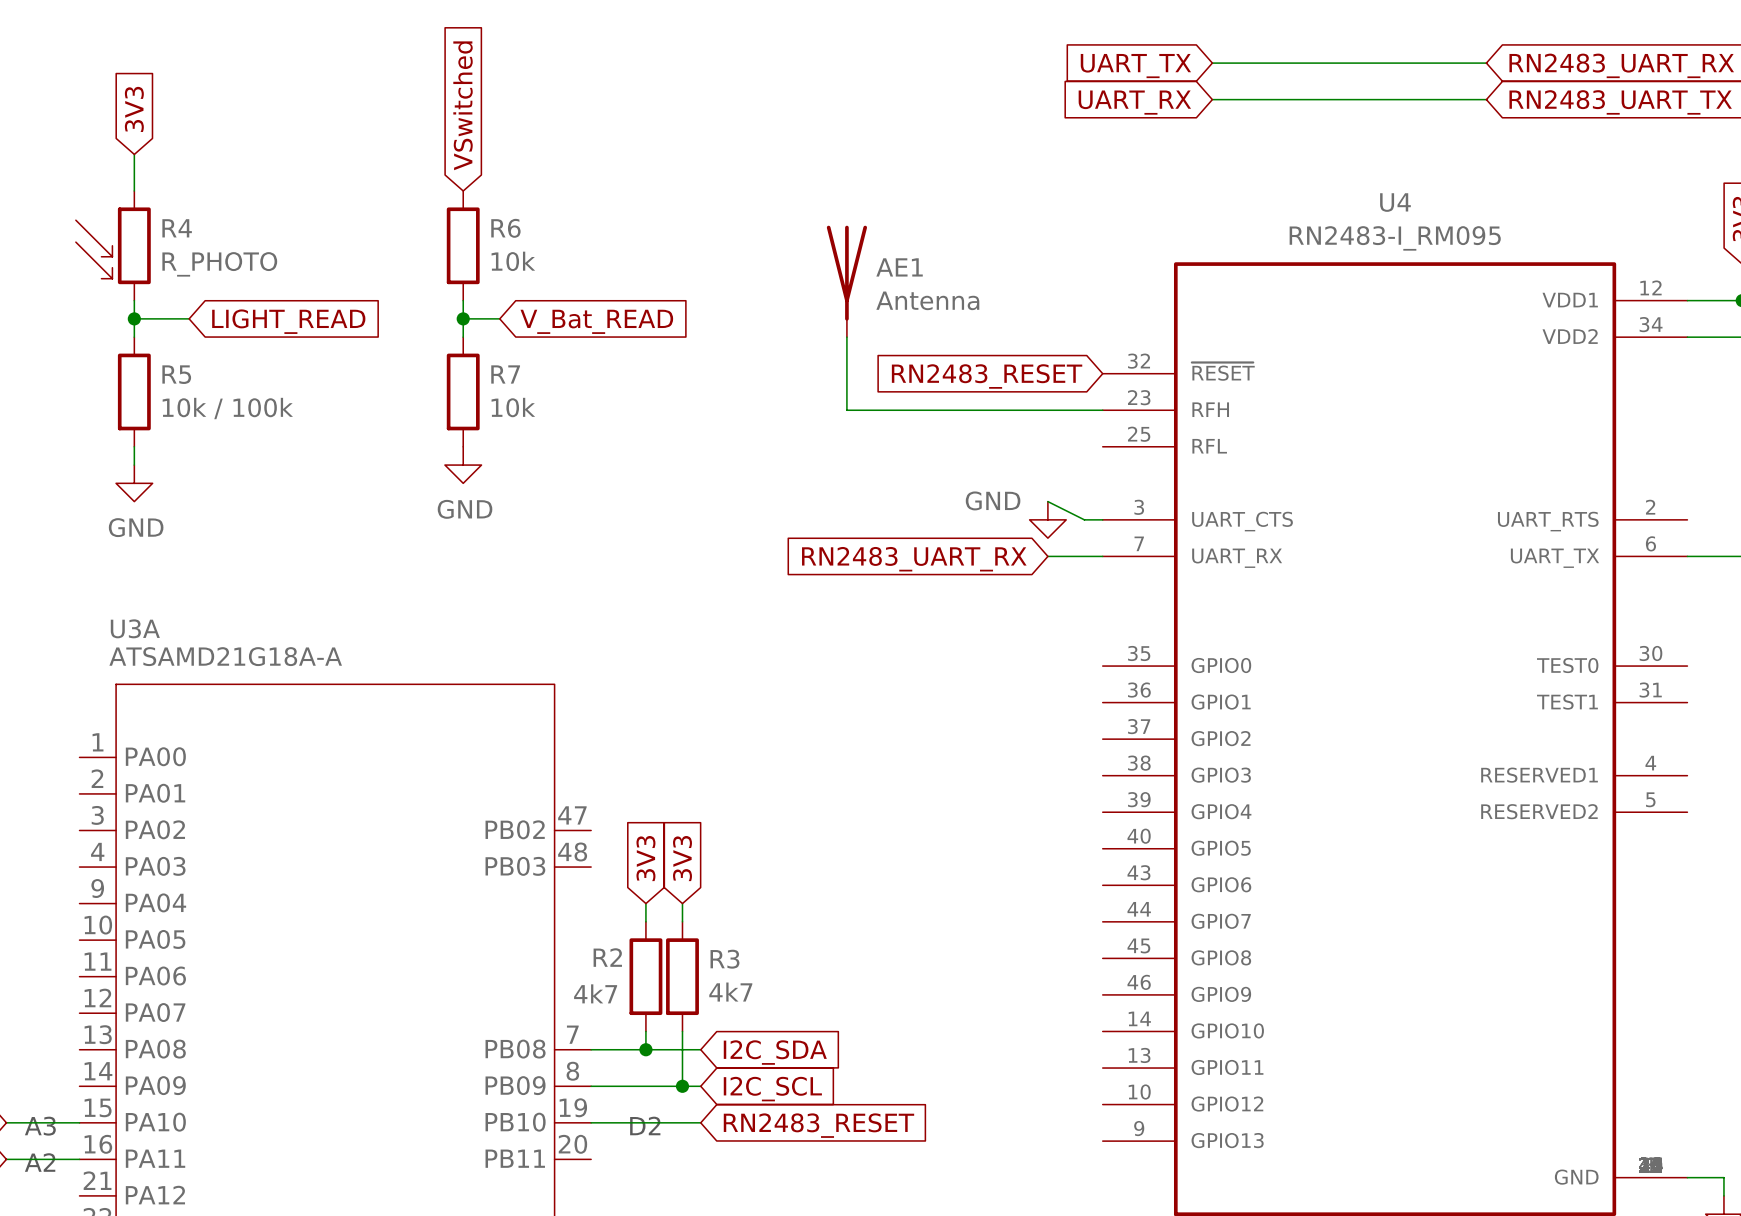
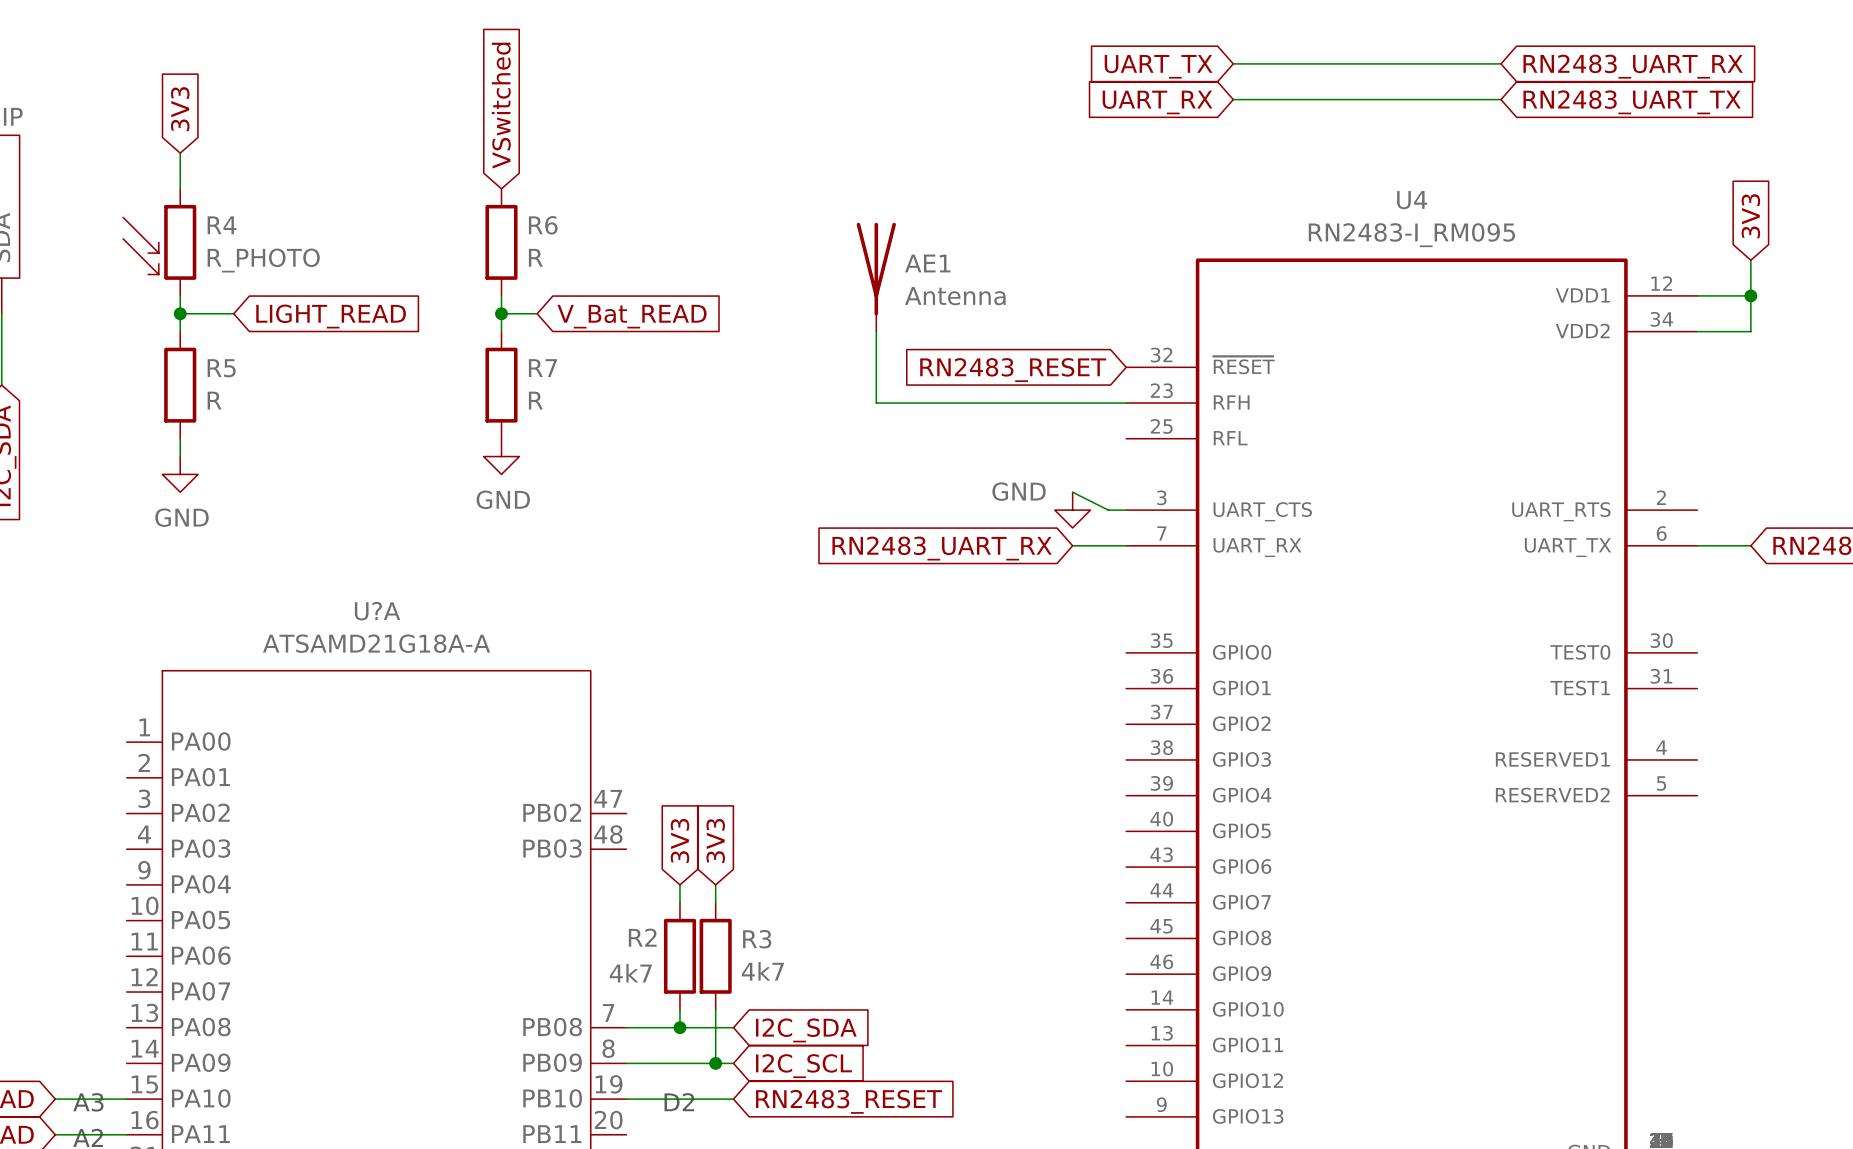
R6 value: 10k (513, 261) -> R (535, 257)
R7 value: 10k (513, 407) -> R (535, 400)
R5 value: 10k / 100k (227, 408) -> R (214, 400)
U3A name: U3A (135, 628) -> U?A (377, 611)
U3A value position: ATSAMD21G18A-A (225, 656) -> ATSAMD21G18A-A (376, 643)

